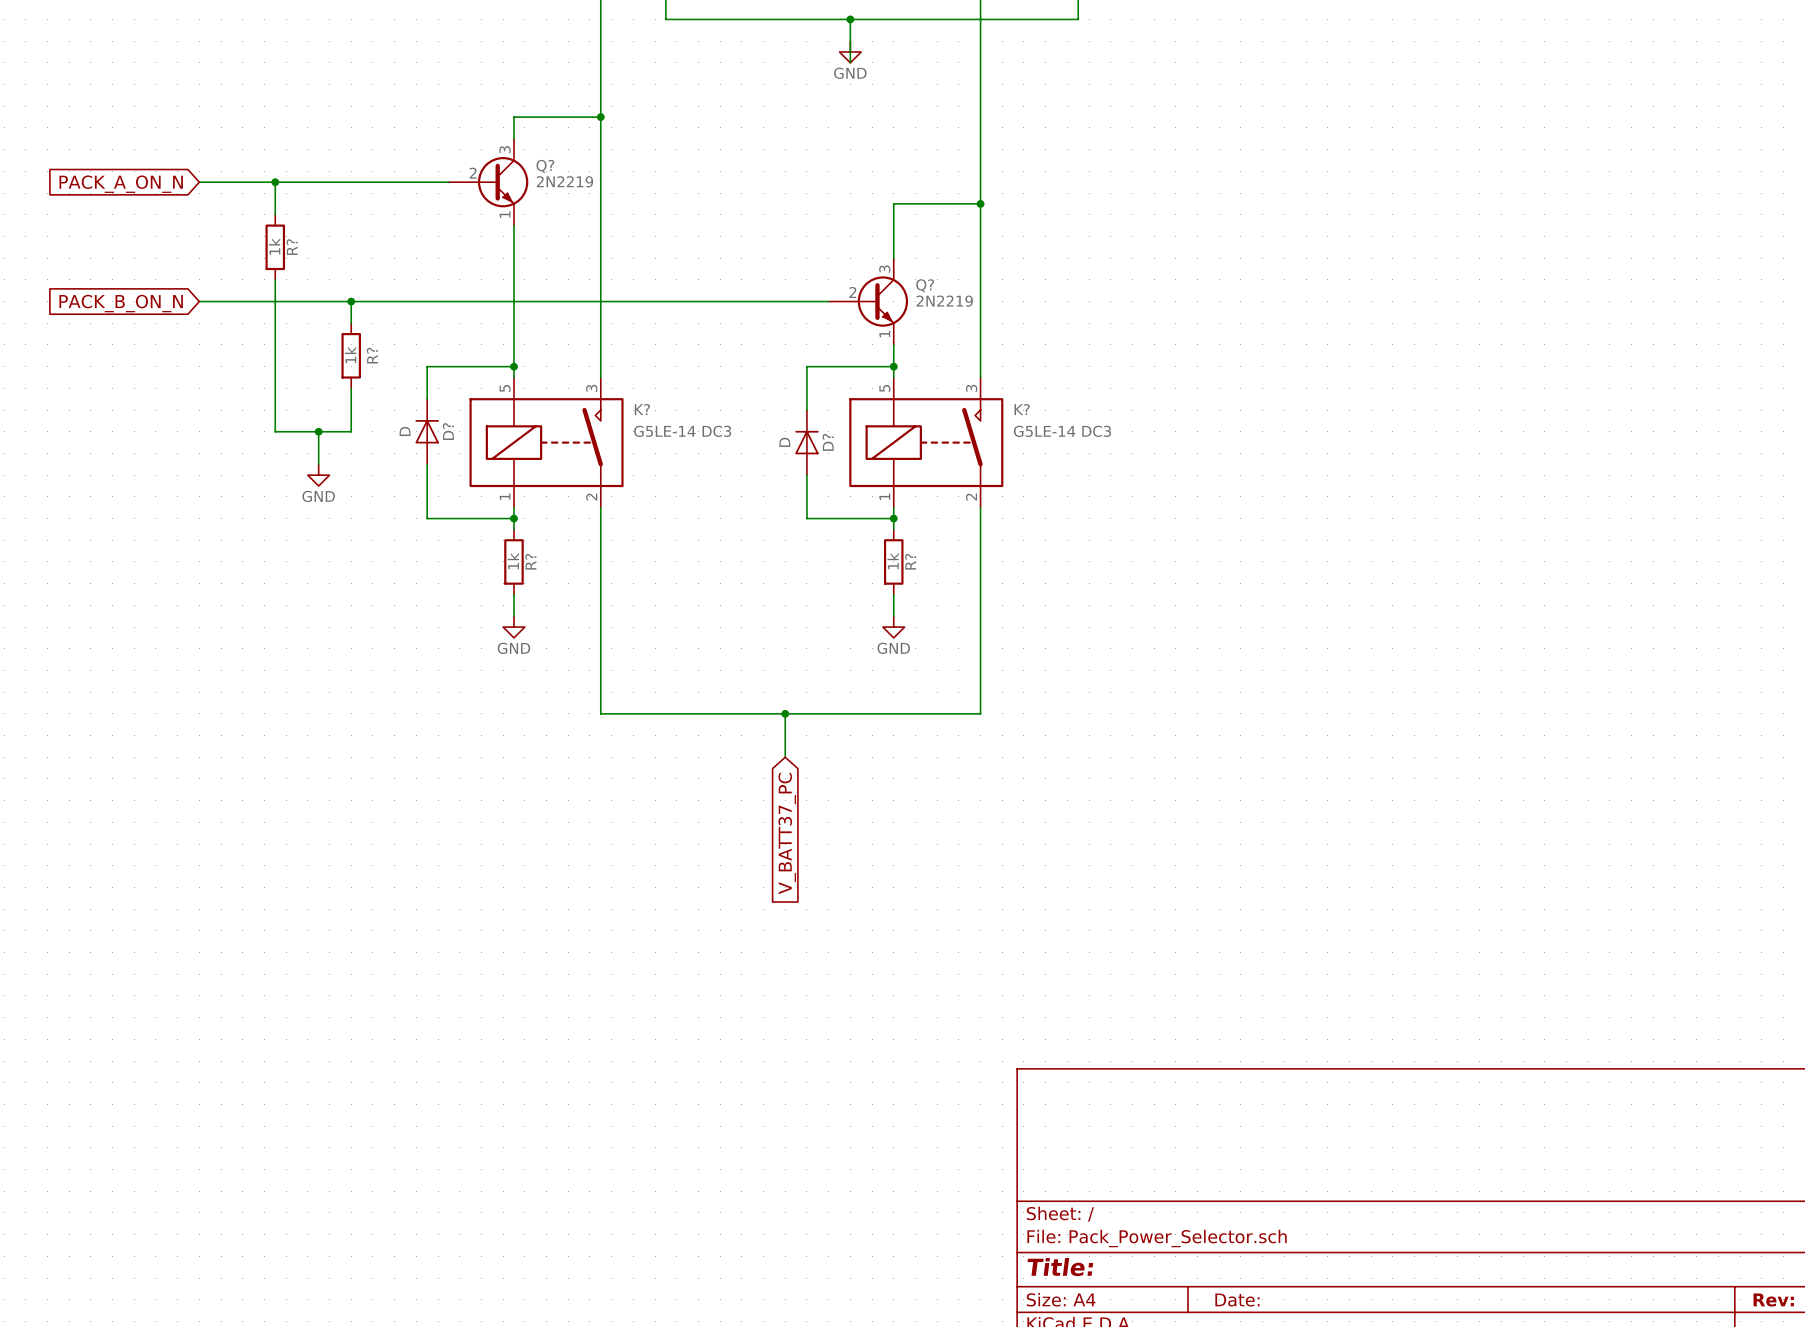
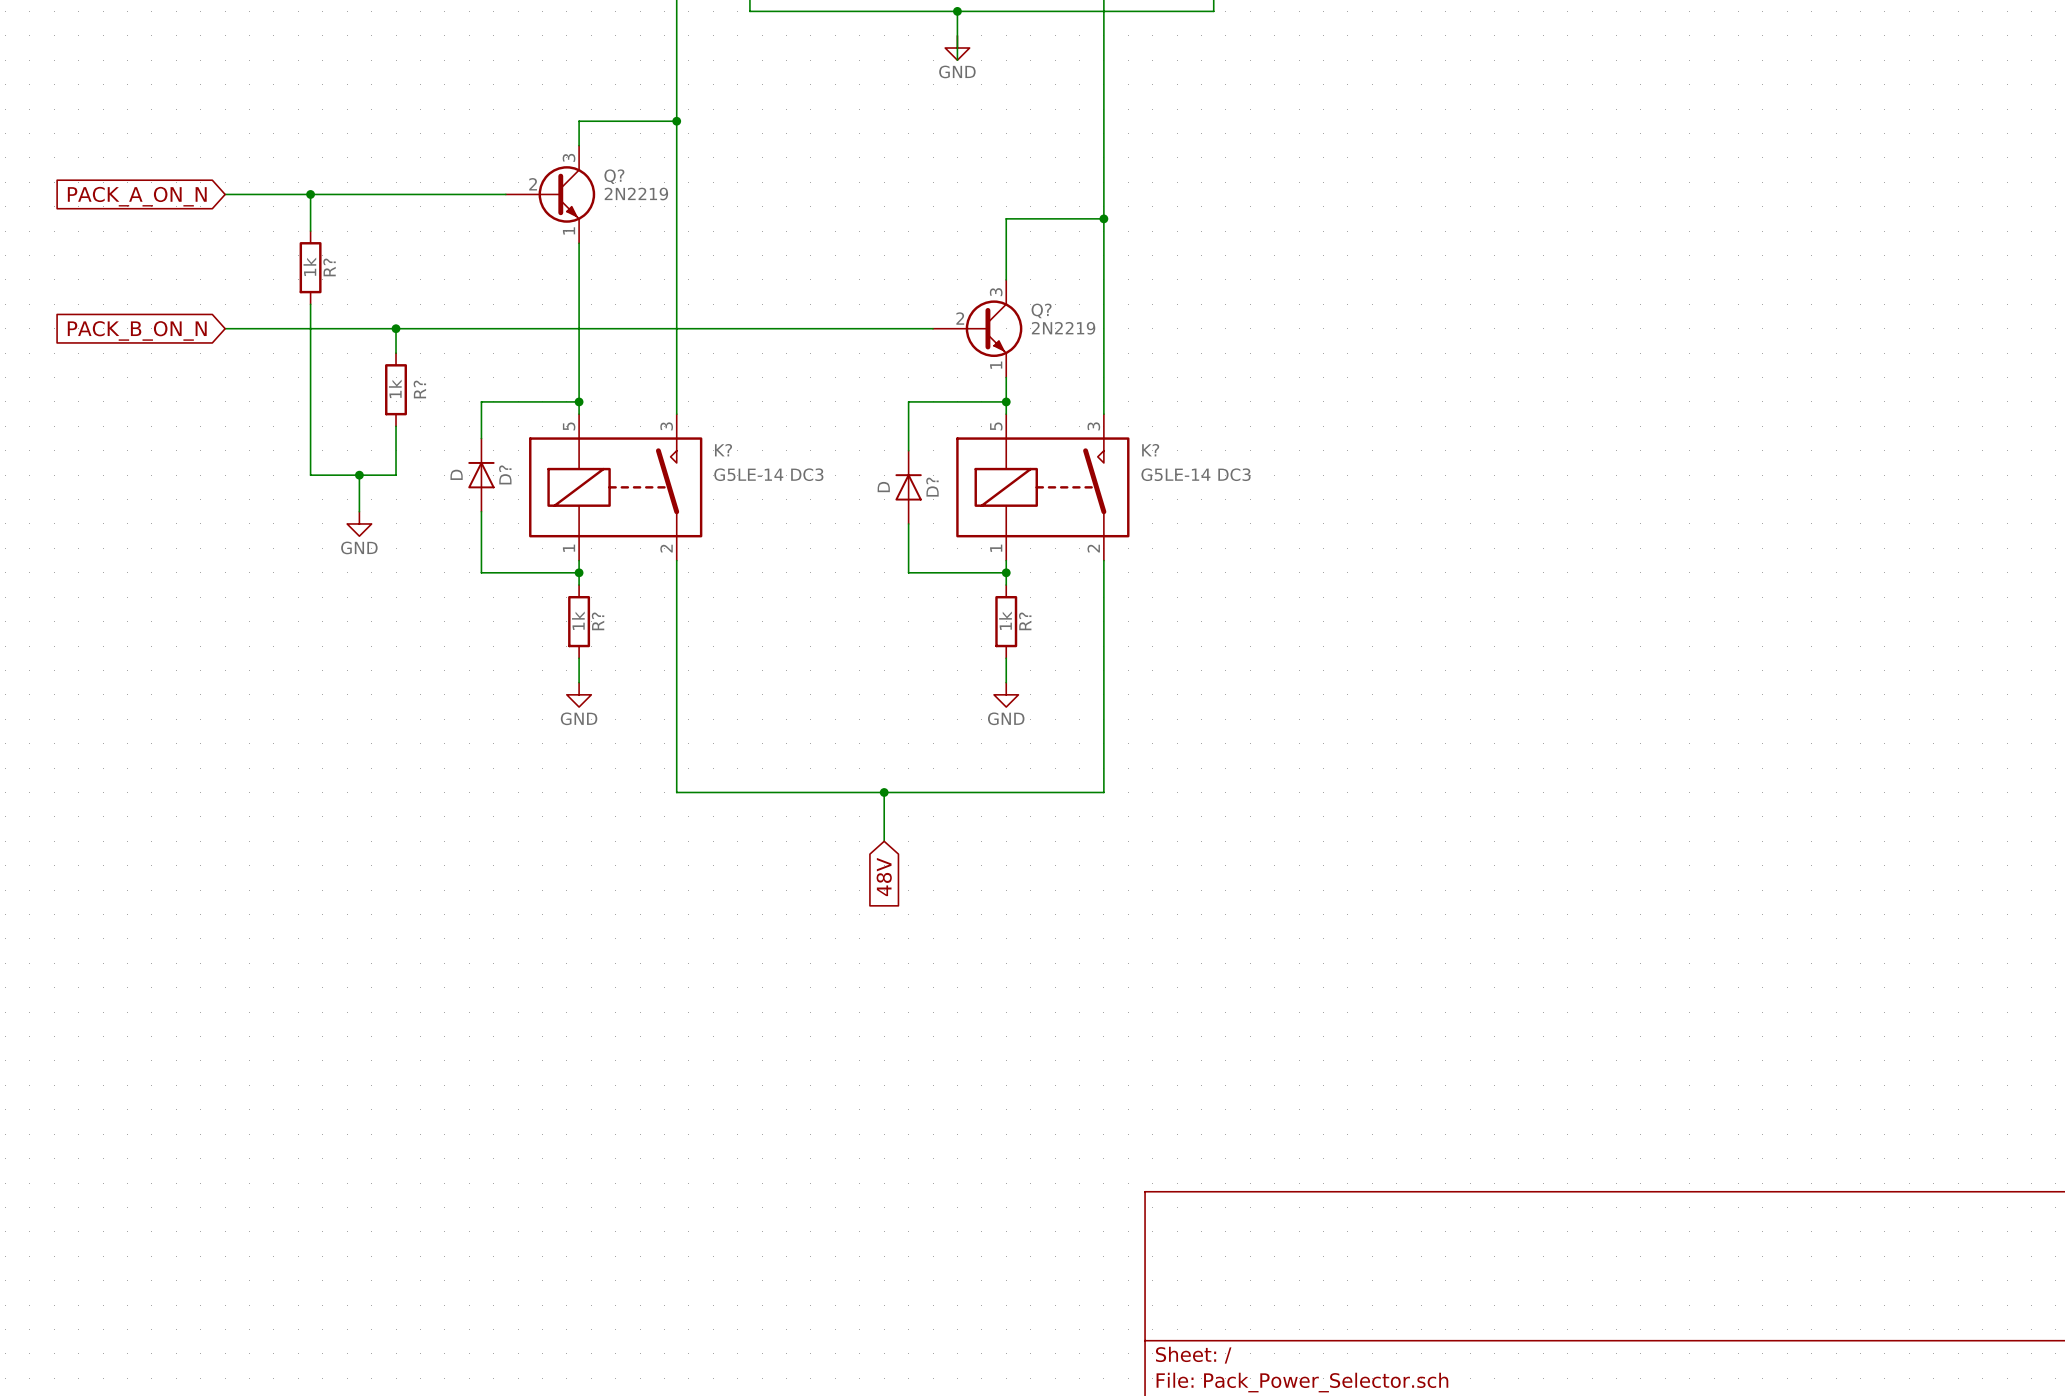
global label: V_BATT37_PC (787, 833) -> 48V (884, 877)

